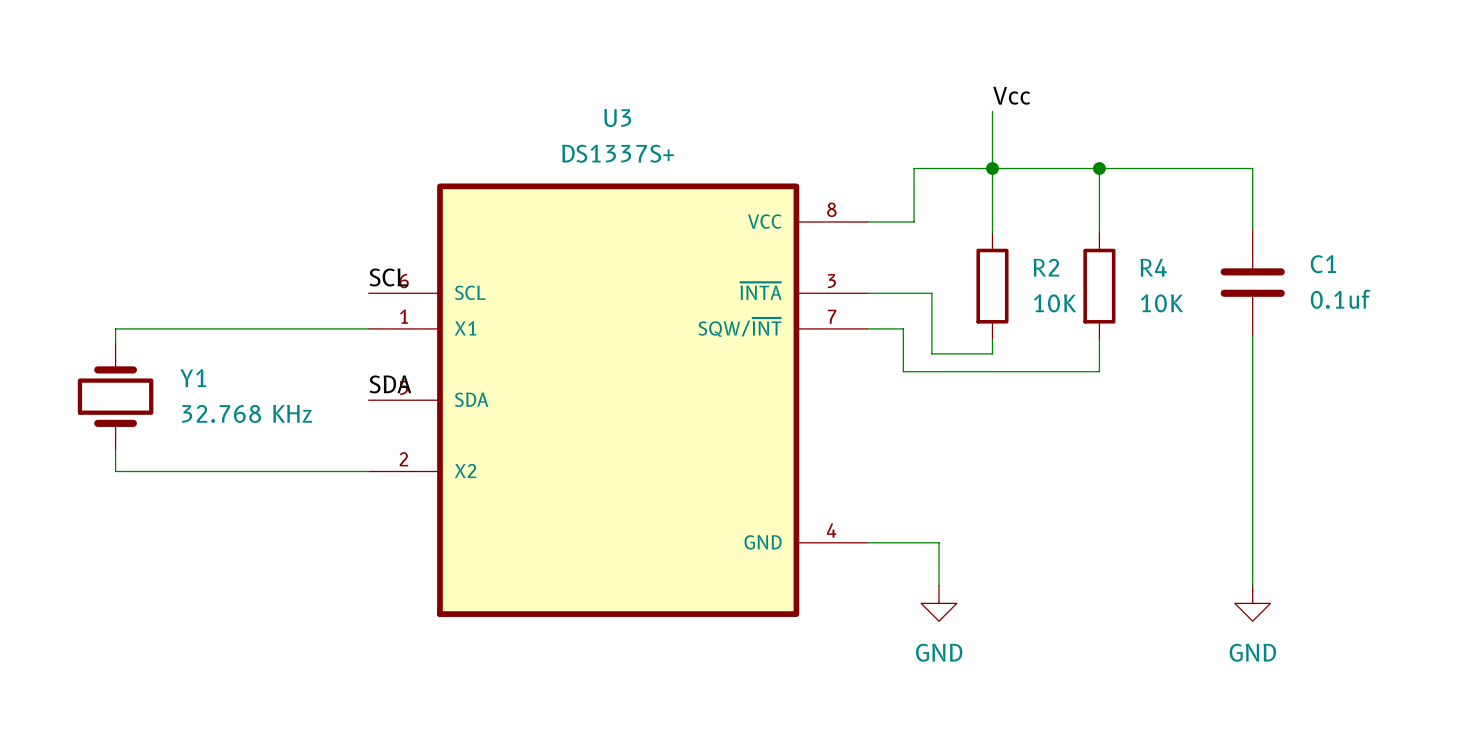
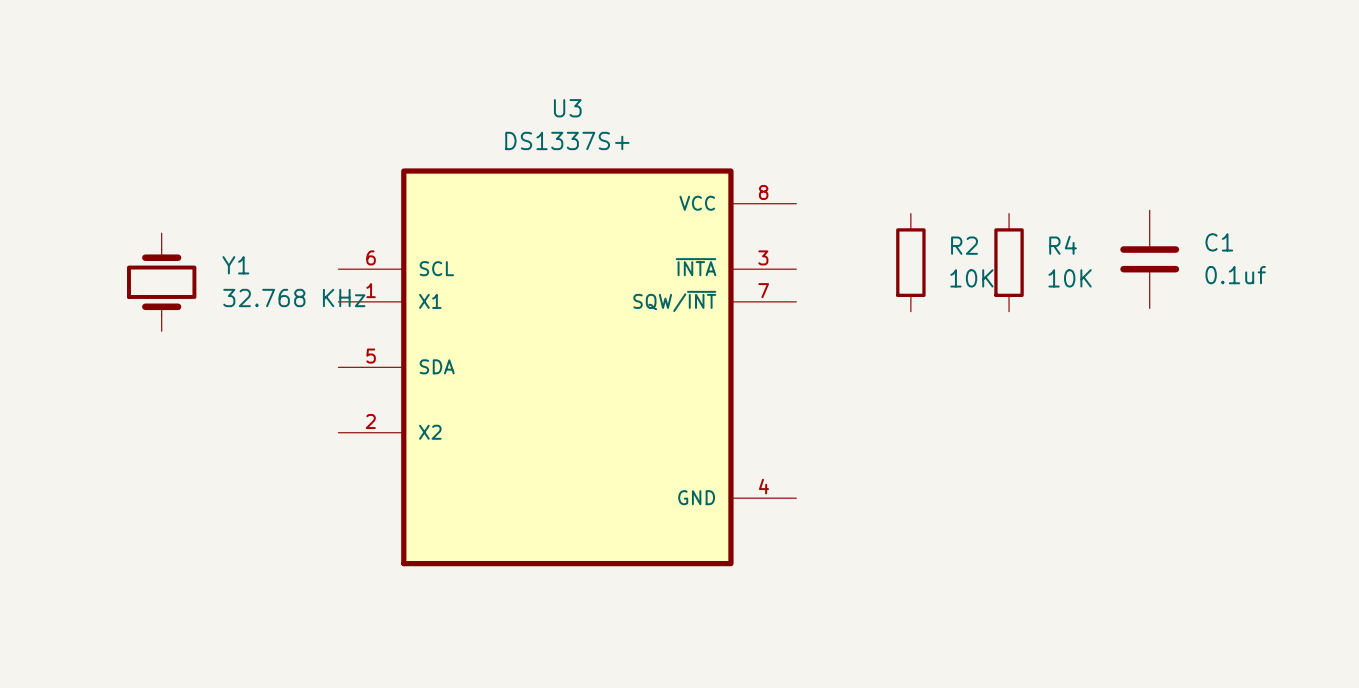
label: Vcc (1011, 95) -> none
wire: (992, 111) (992, 232) -> none
junction: (992, 168) -> none
wire: (1099, 168) (1099, 232) -> none
junction: (1099, 168) -> none
wire: (867, 221) (914, 221) (914, 168) (1252, 168) (1252, 229) -> none
label: SCL (388, 277) -> none
wire: (867, 293) (931, 293) (931, 353) (992, 353) (992, 339) -> none
wire: (368, 328) (115, 328) (115, 343) -> none
wire: (867, 328) (903, 328) (903, 371) (1099, 371) (1099, 339) -> none
wire: (1252, 336) (1252, 585) -> none
label: SDA (390, 384) -> none
Y1 position: (115, 396) -> (161, 282)
wire: (115, 450) (115, 471) (368, 471) -> none
wire: (867, 542) (939, 542) (939, 585) -> none
power symbol: GND (939, 603) -> none
power symbol: GND (1252, 603) -> none

